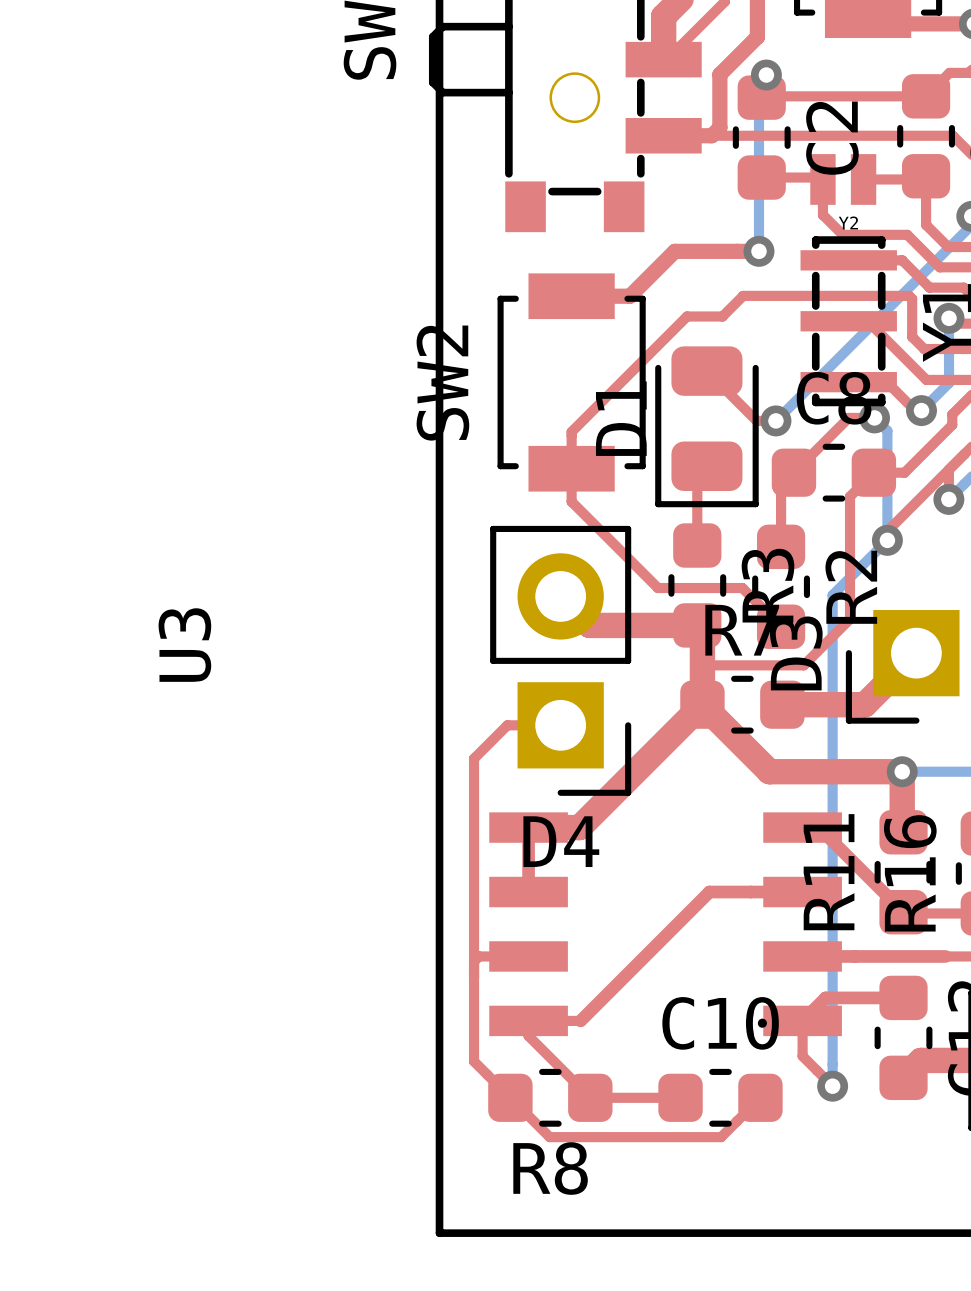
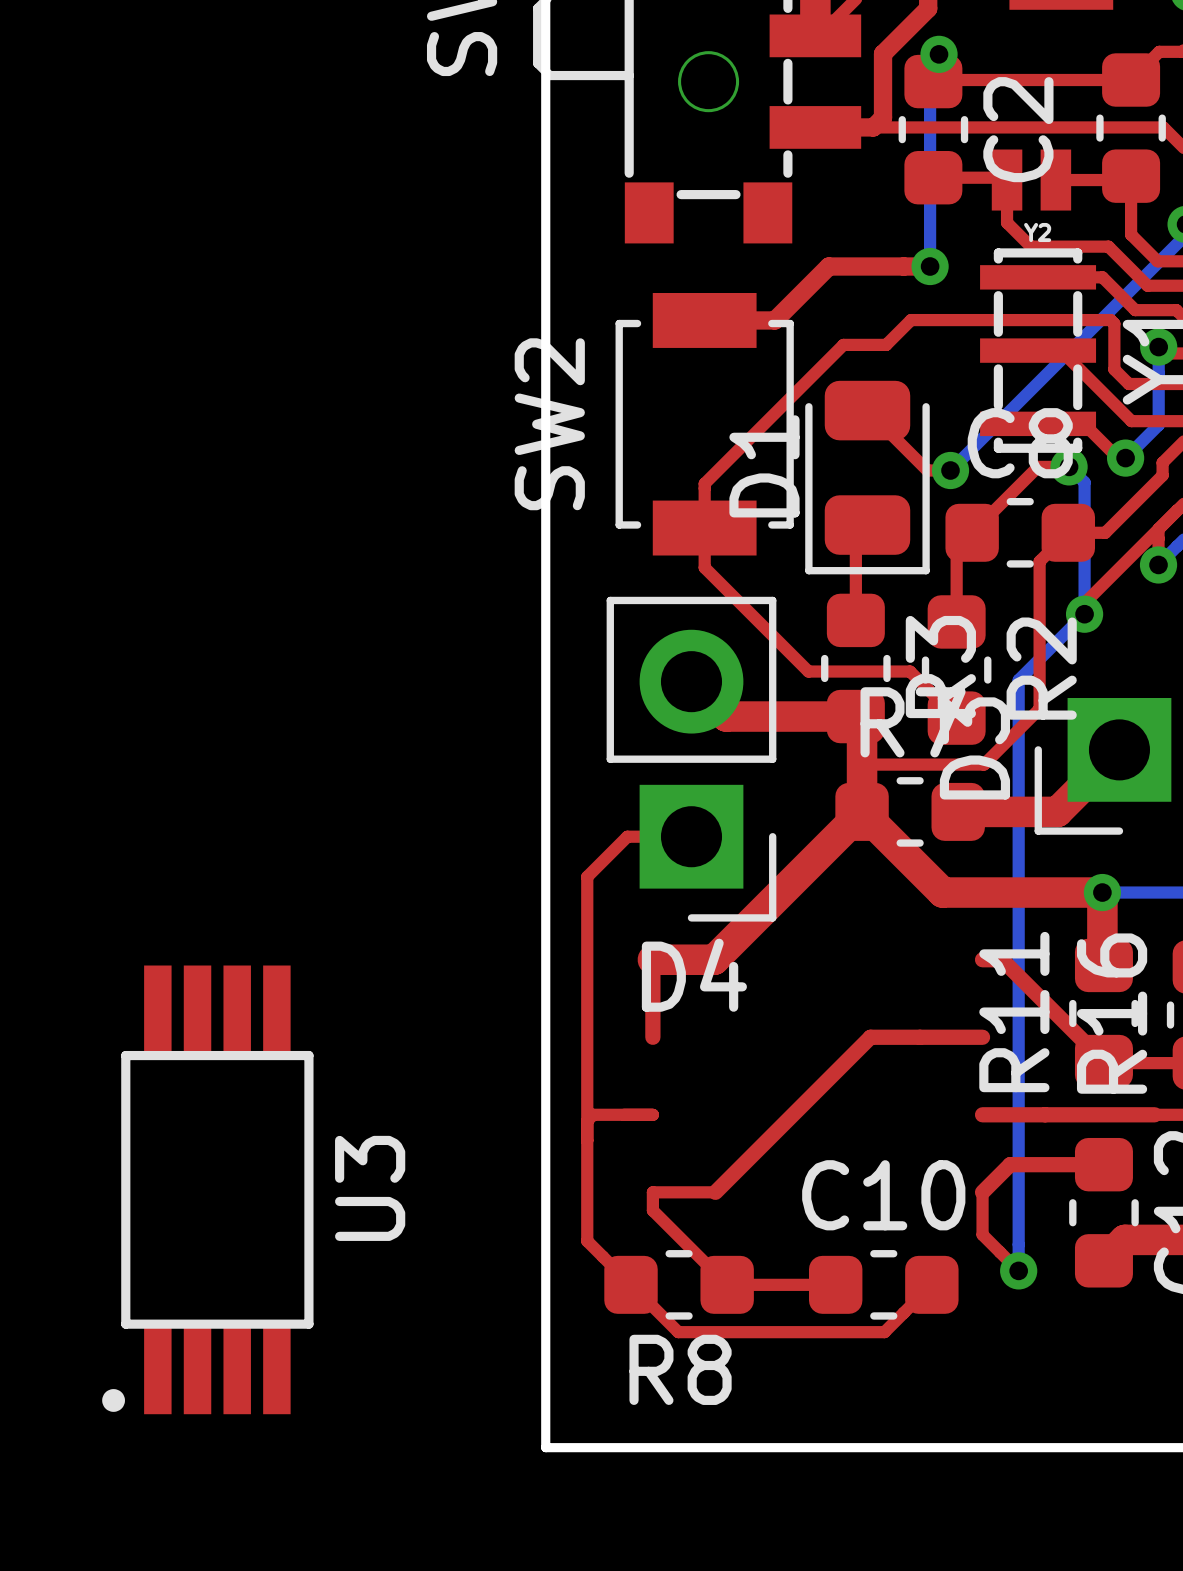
U3 name position: U3 (184, 645) -> U3 (370, 1188)
U3 footprint: [489, 812, 842, 1037] -> [102, 965, 314, 1415]

